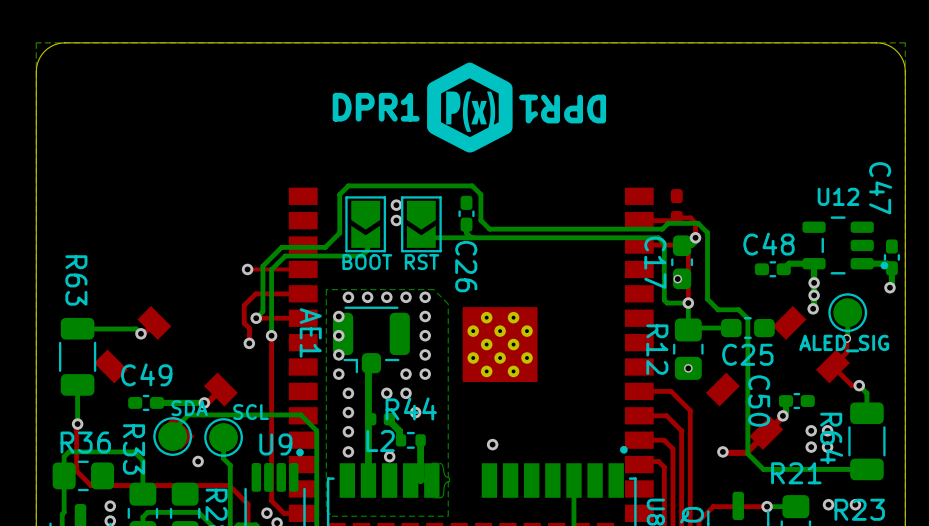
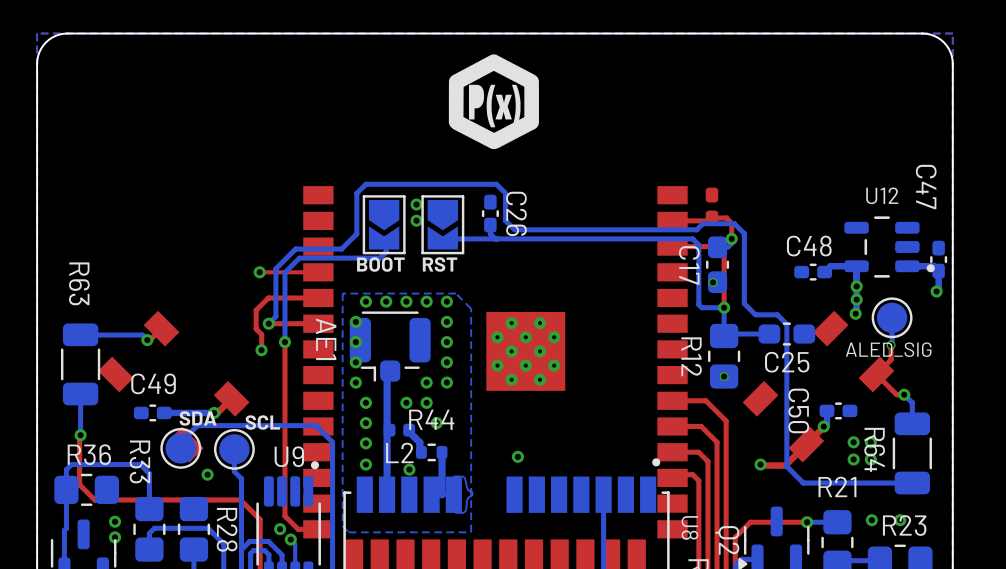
text: DPR1 (376, 107) -> none
text: DPR1 (562, 109) -> none
C26 name position: C26 (466, 266) -> C26 (516, 213)

